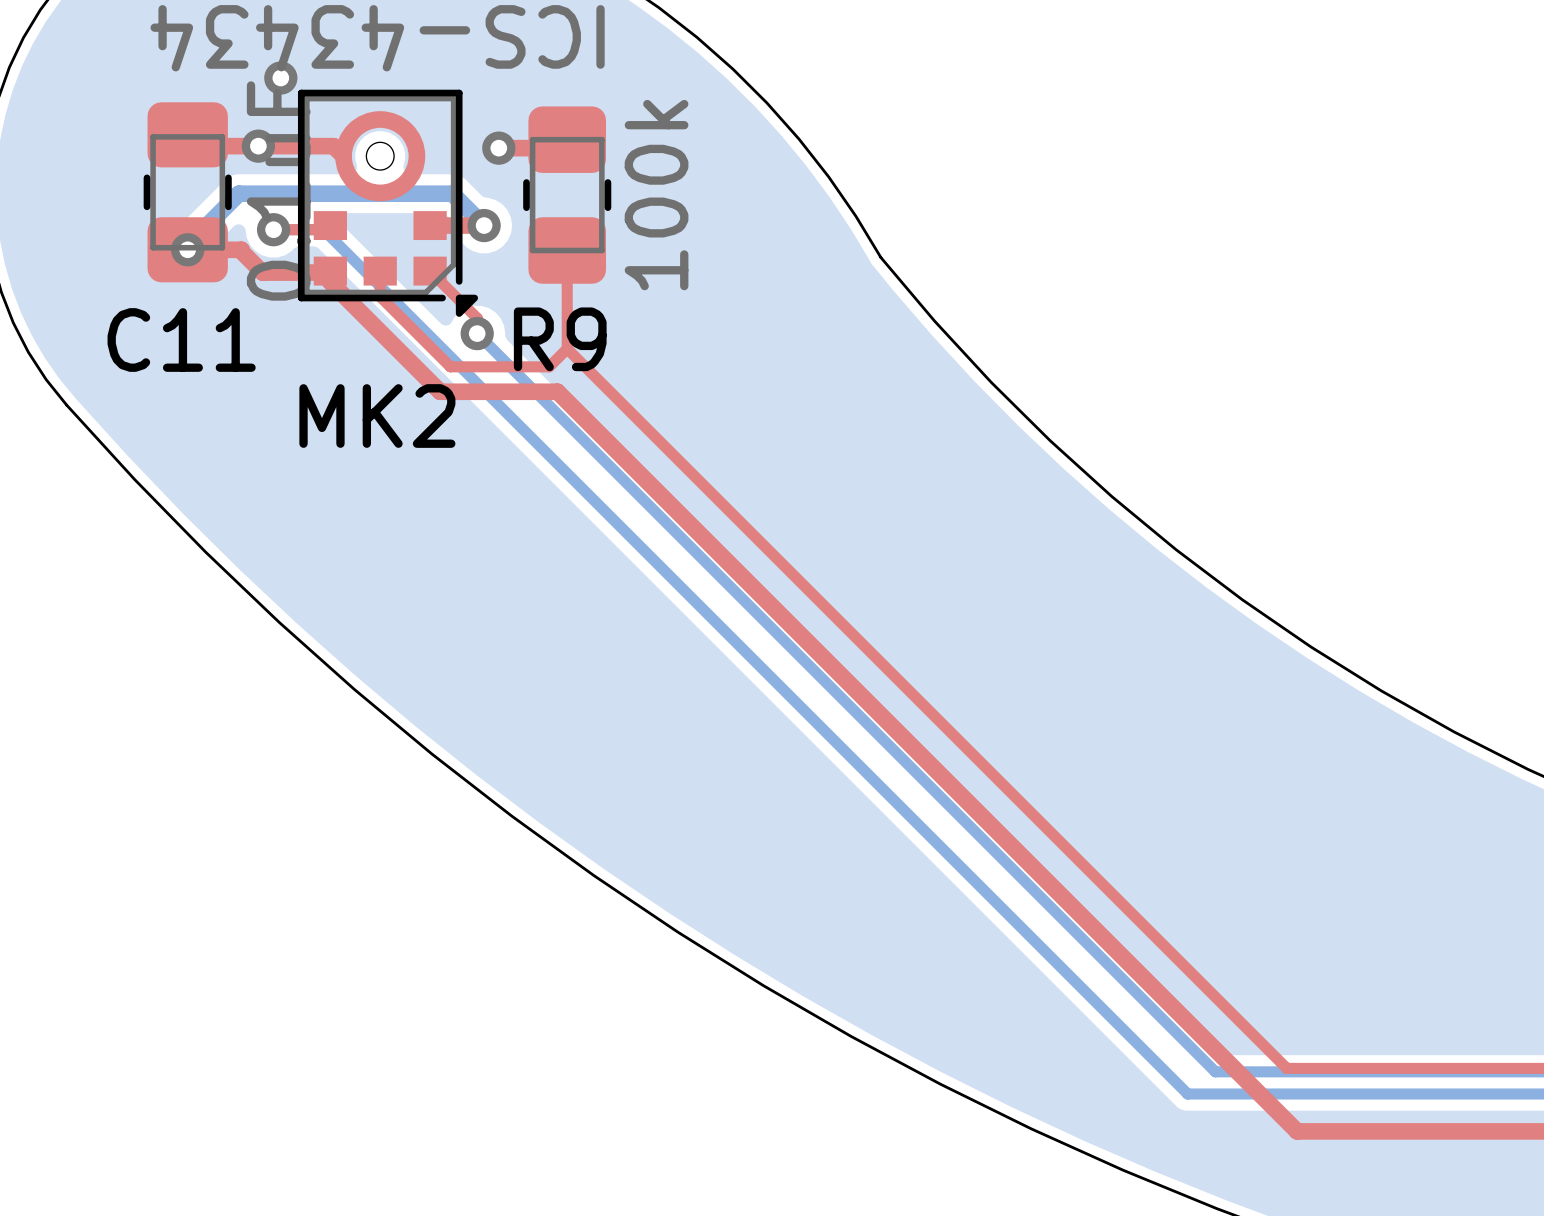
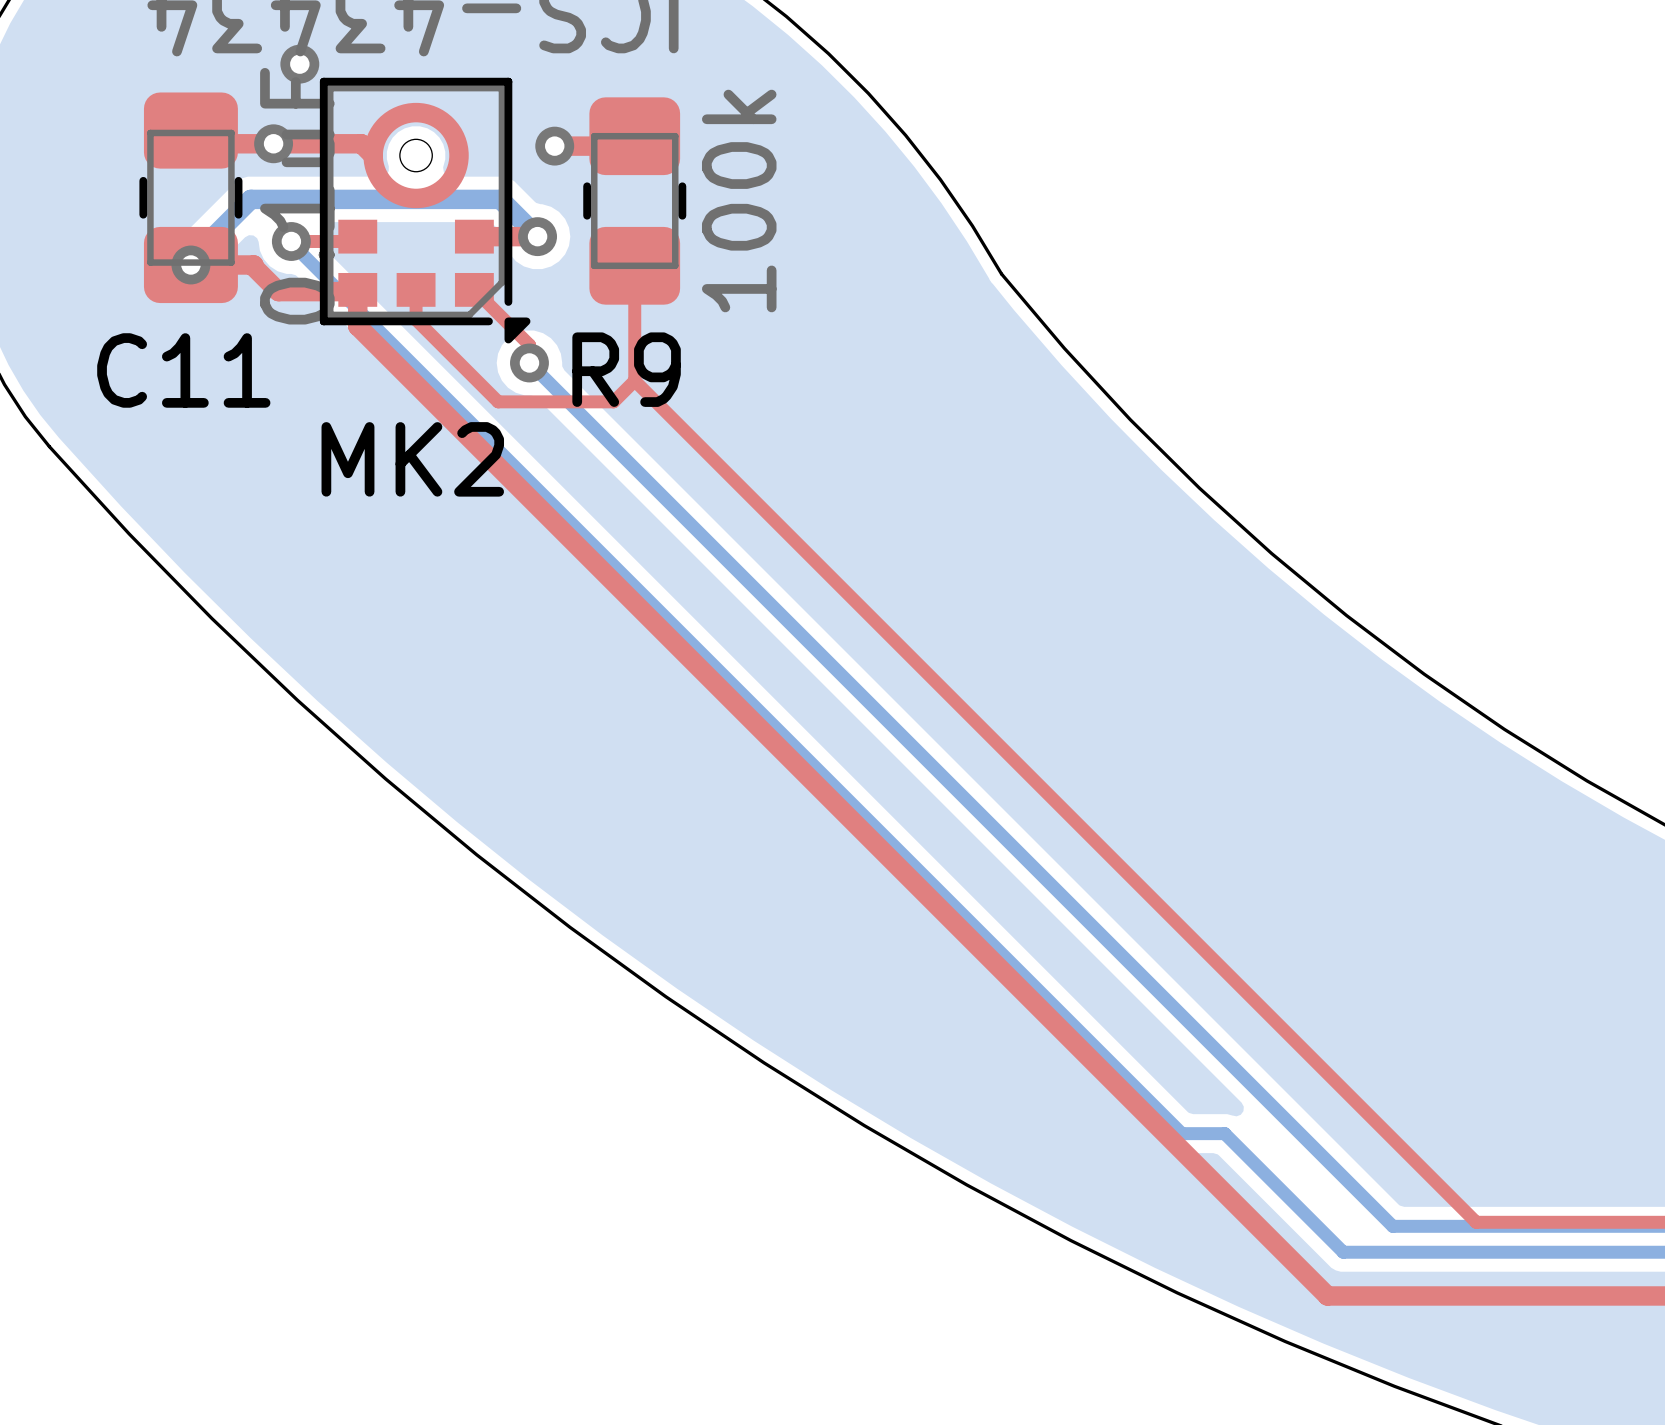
bottom track: (273, 229) (323, 229) (1187, 1094) -> (291, 241) (1181, 1133) (1224, 1133) (1343, 1252) (1360, 1252)
top track: (330, 282) (440, 391) (557, 391) (1297, 1131) -> (357, 302) (357, 326) (1327, 1295) (1488, 1295)

